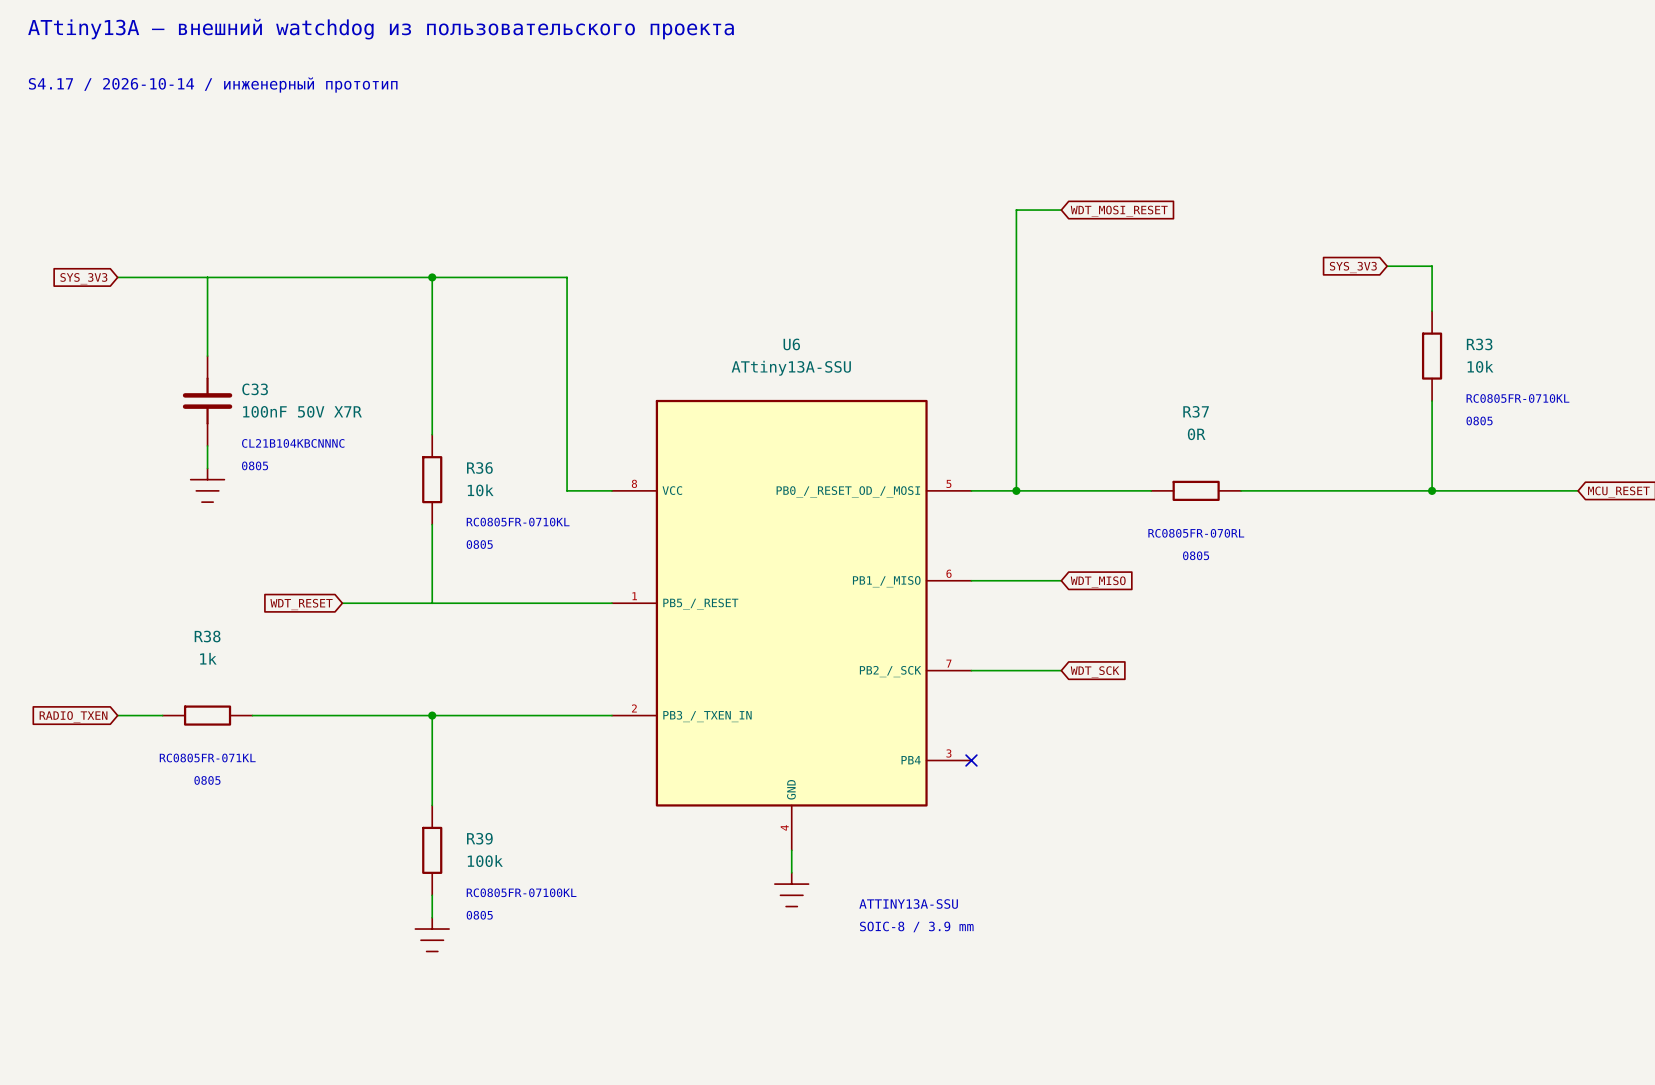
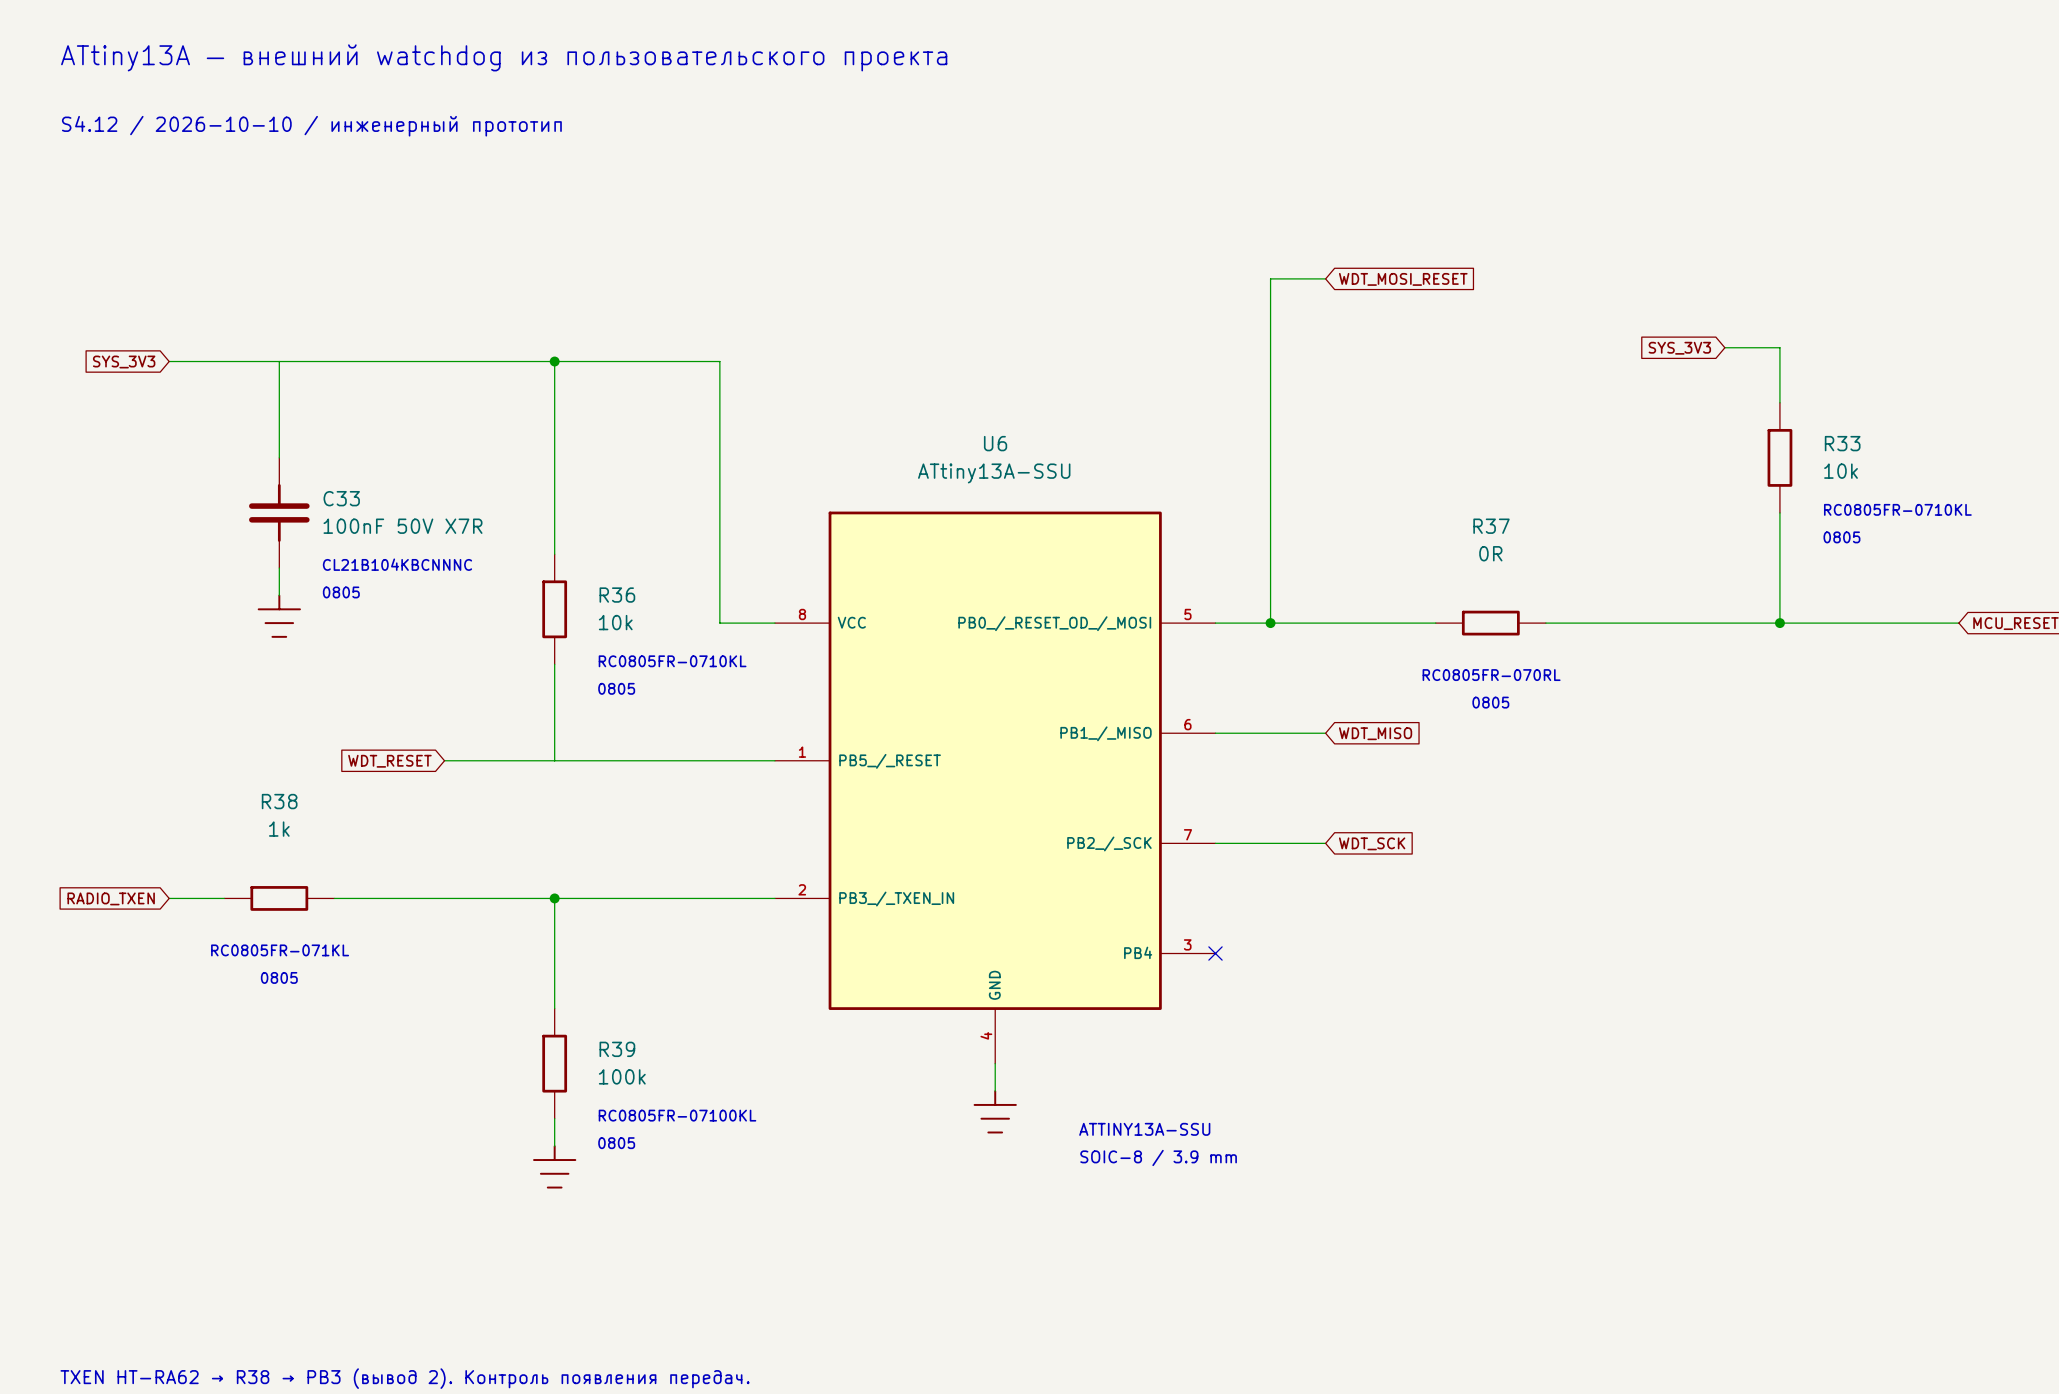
text: S4.17 / 2026-10-14 / инженерный прототип (213, 85) -> S4.12 / 2026-10-10 / инженерный прототип (311, 126)

